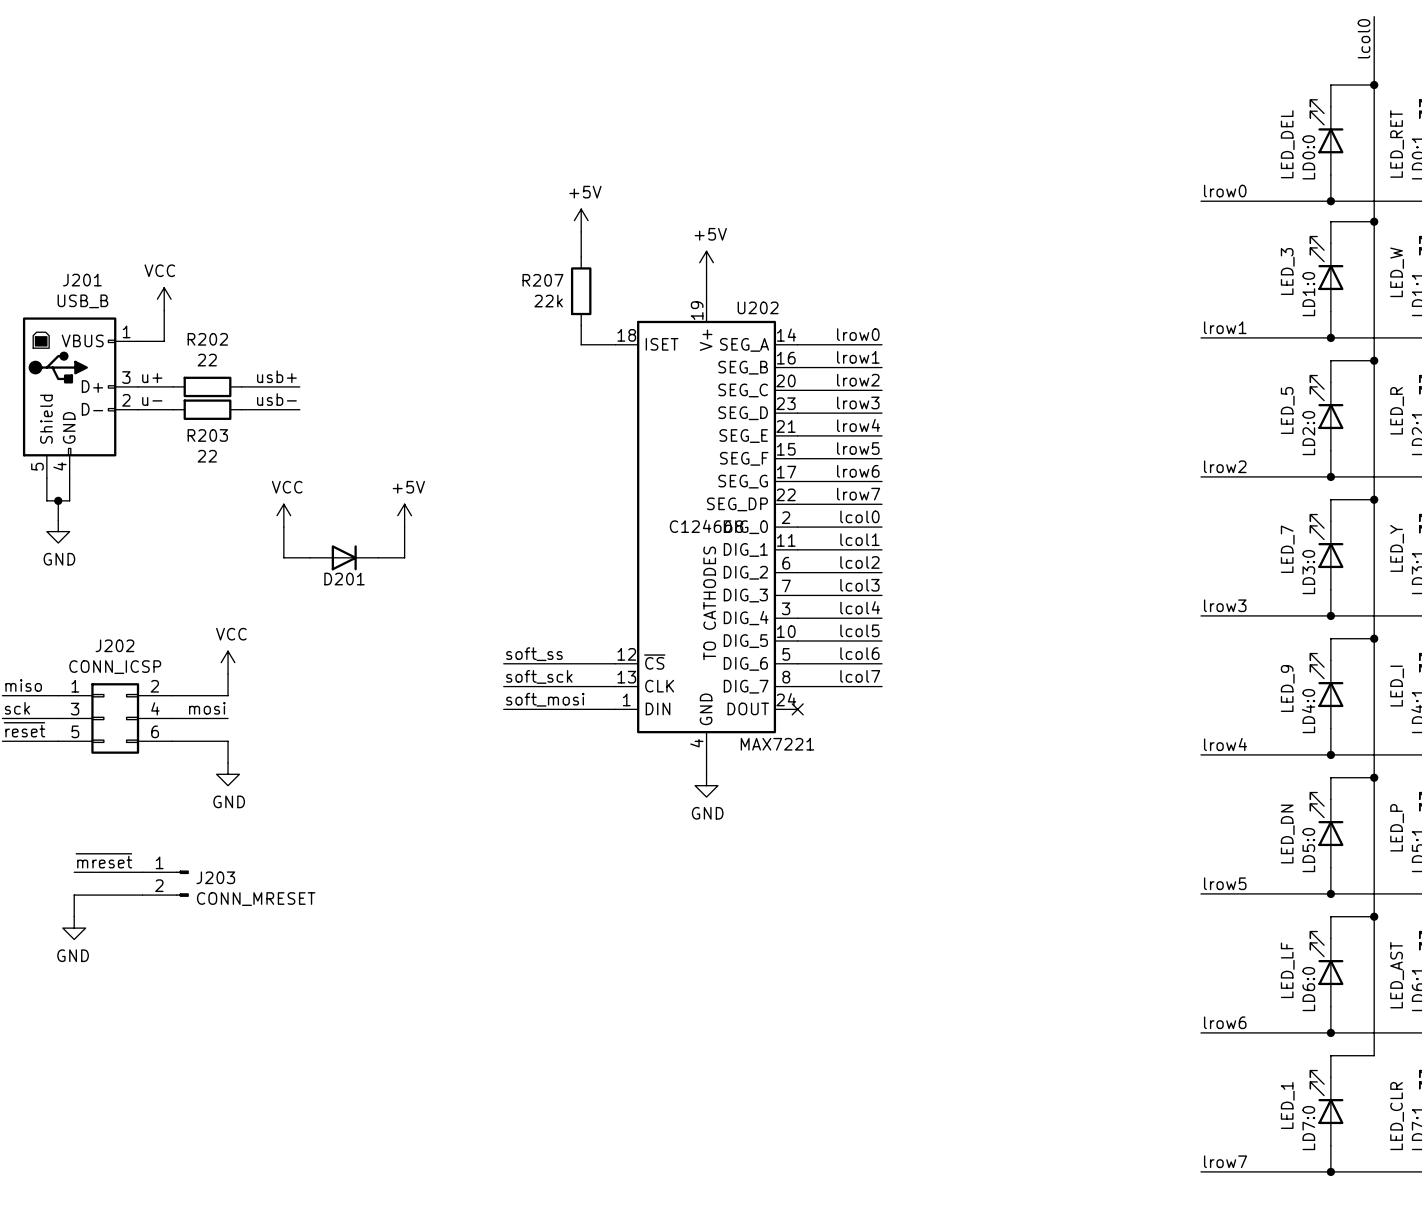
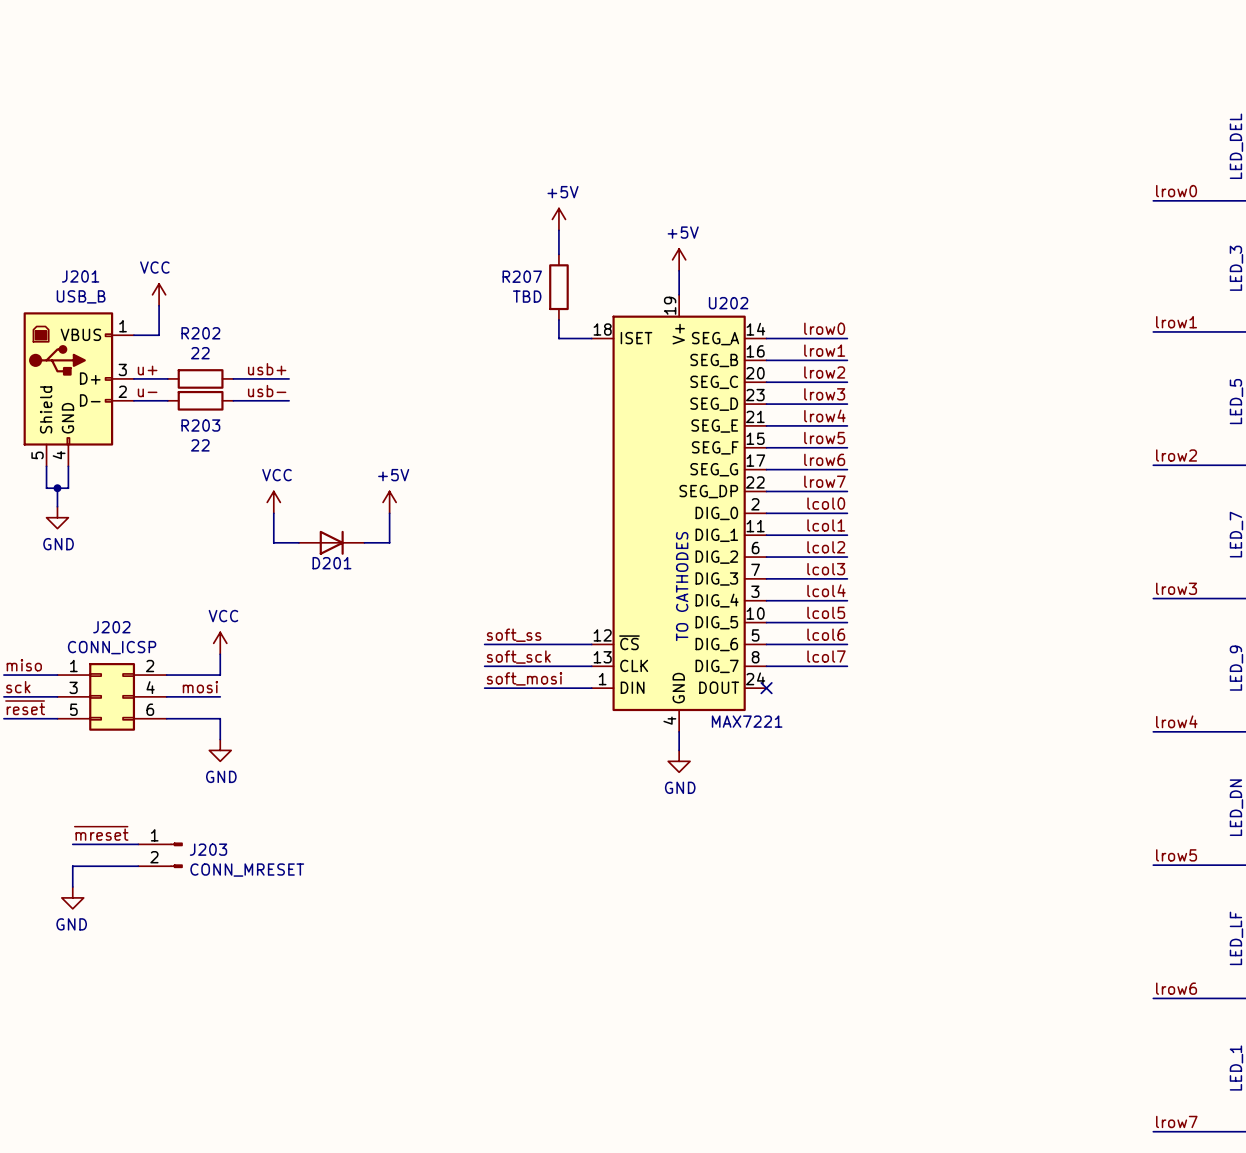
R207 value: 22k (548, 301) -> TBD (527, 296)
U202 text: C124668 (706, 526) -> none

